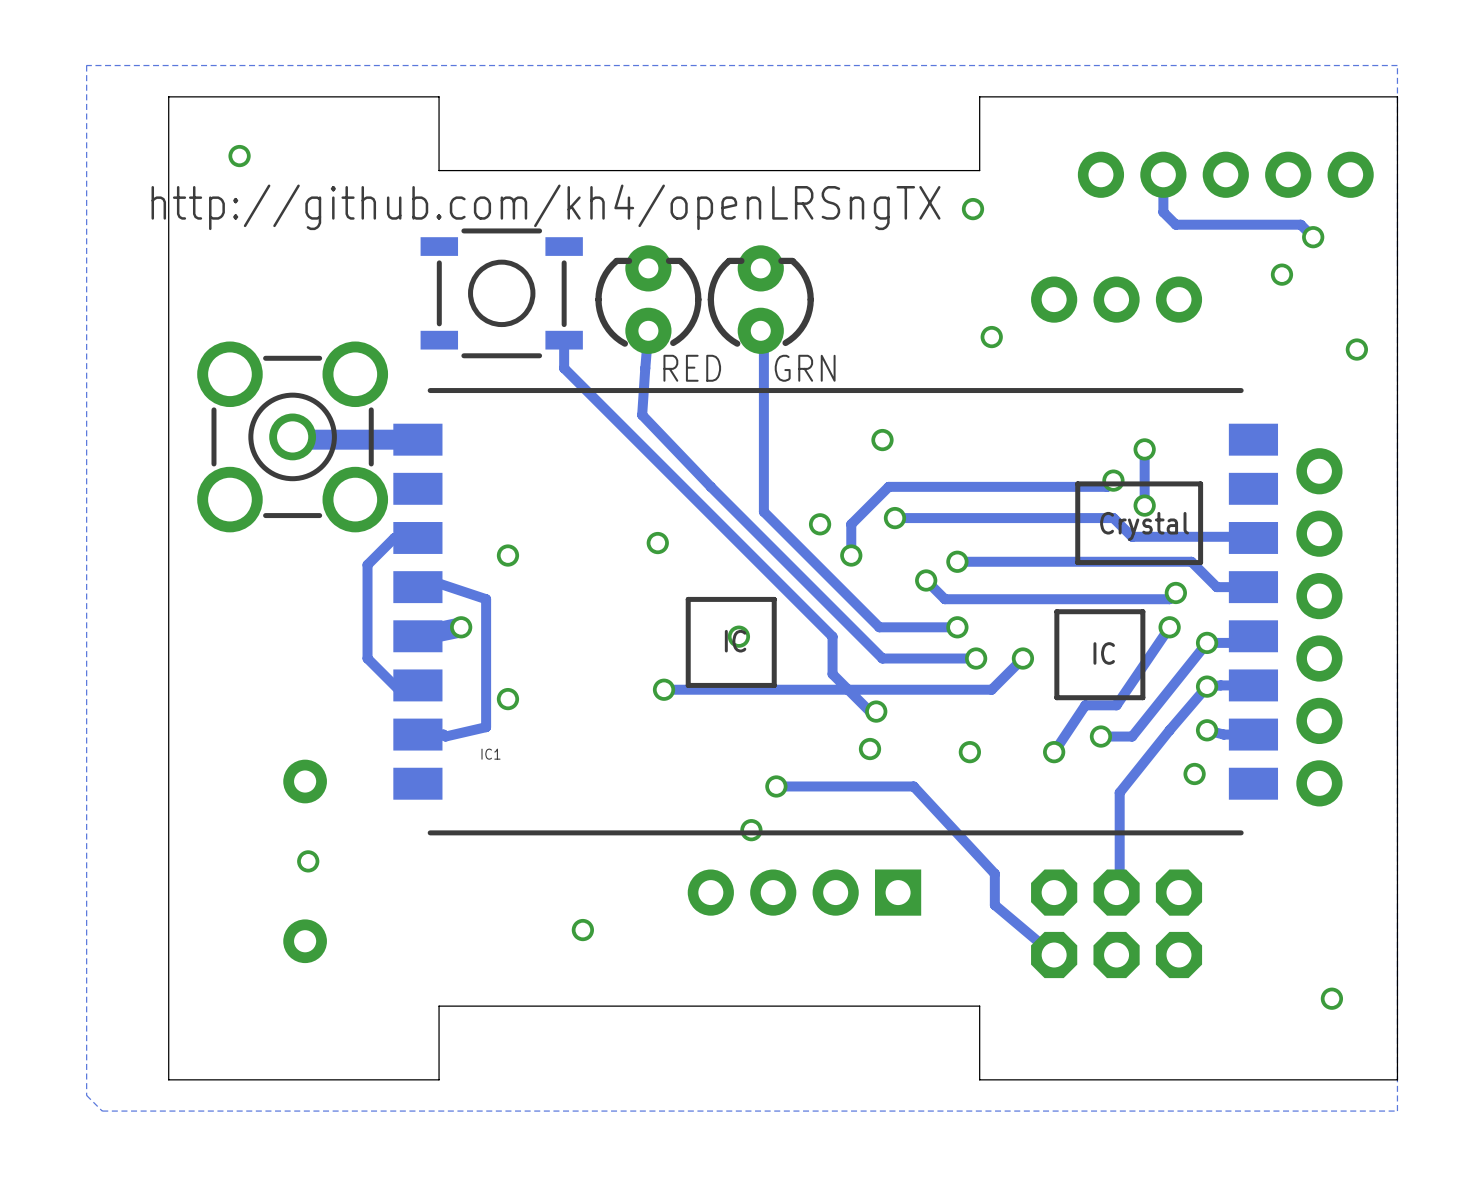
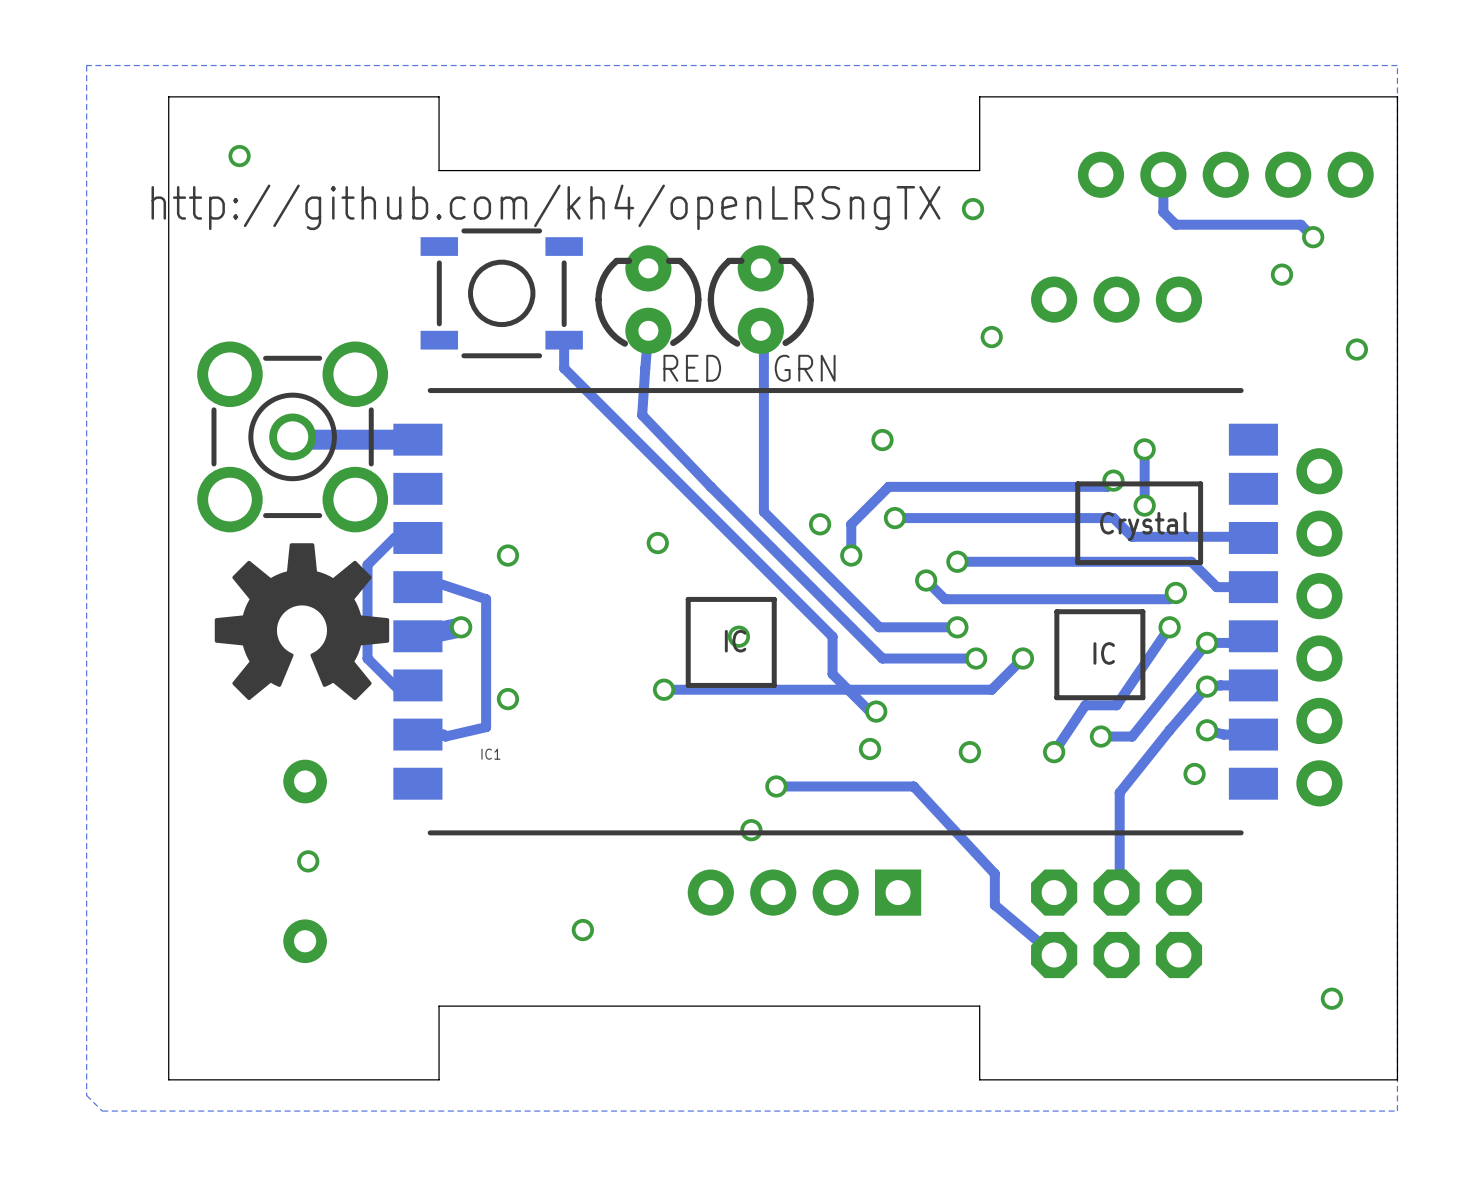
drawing: none -> [214, 543, 390, 701]

